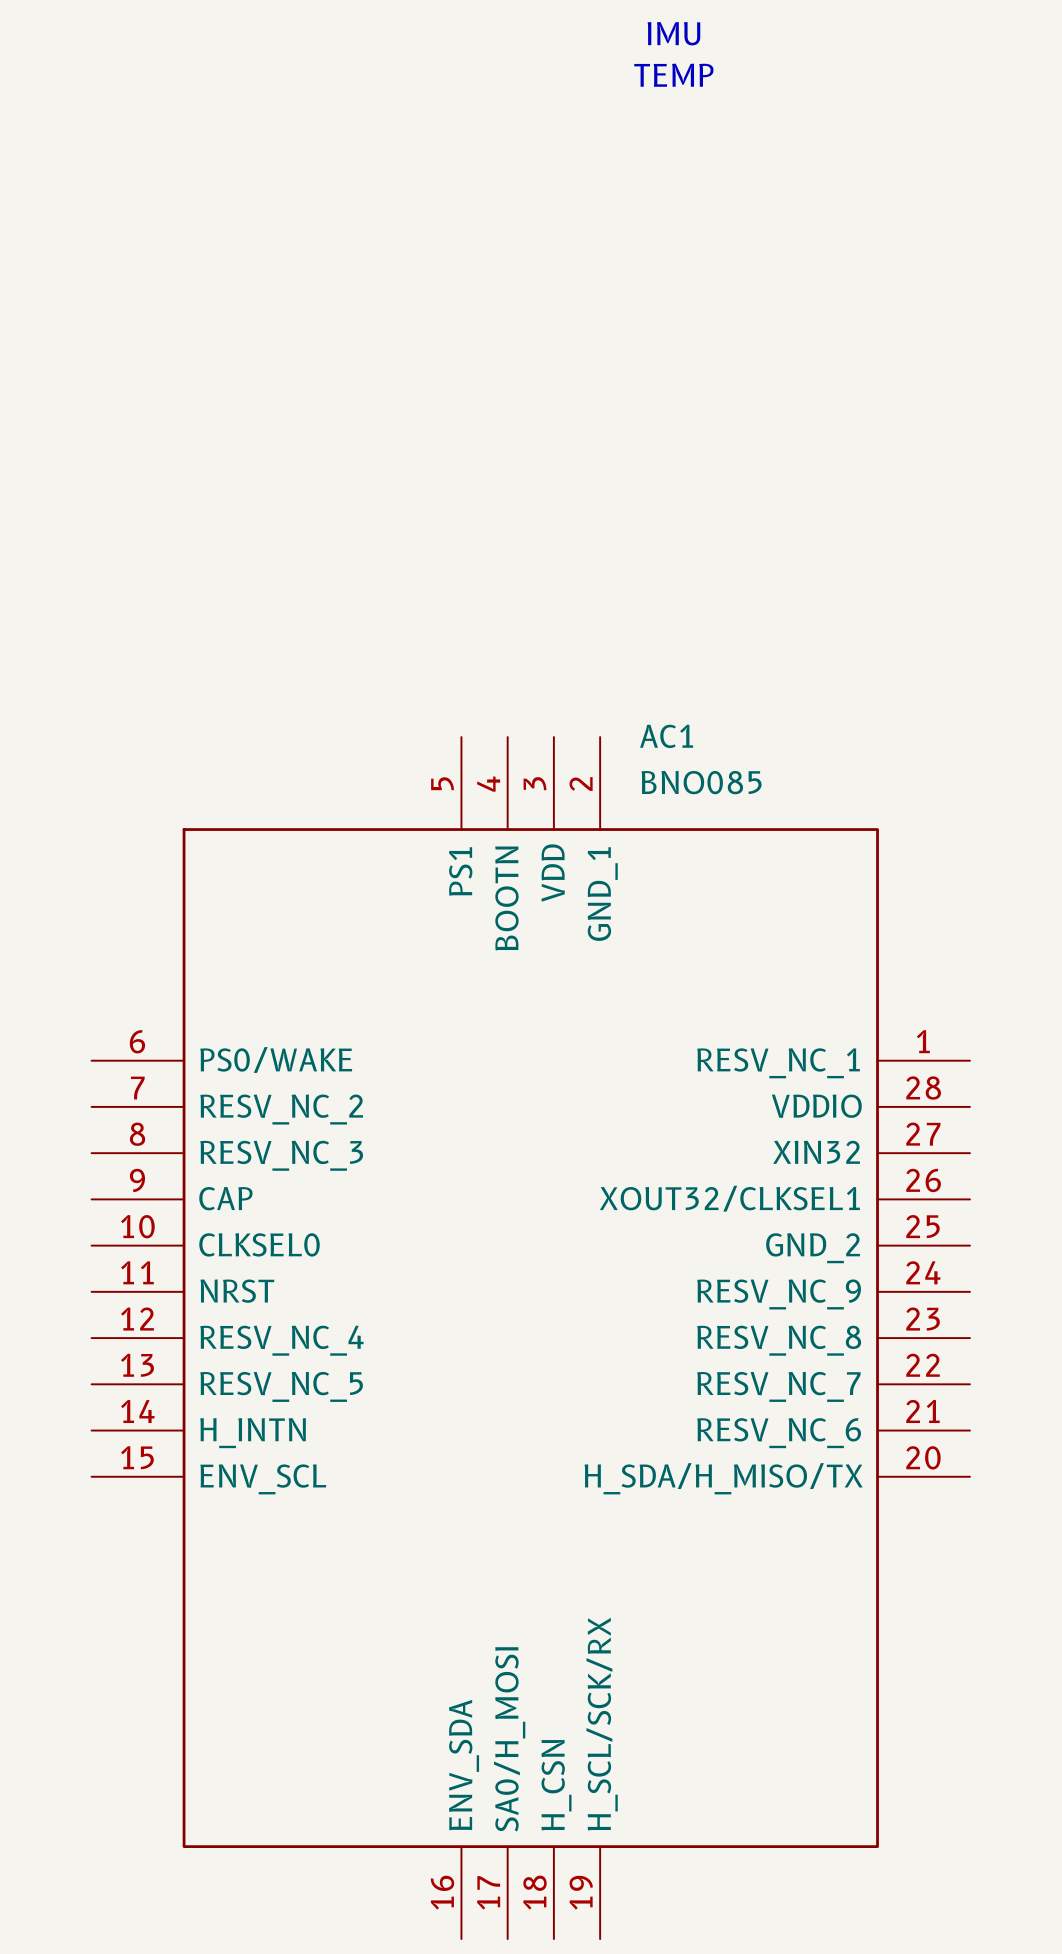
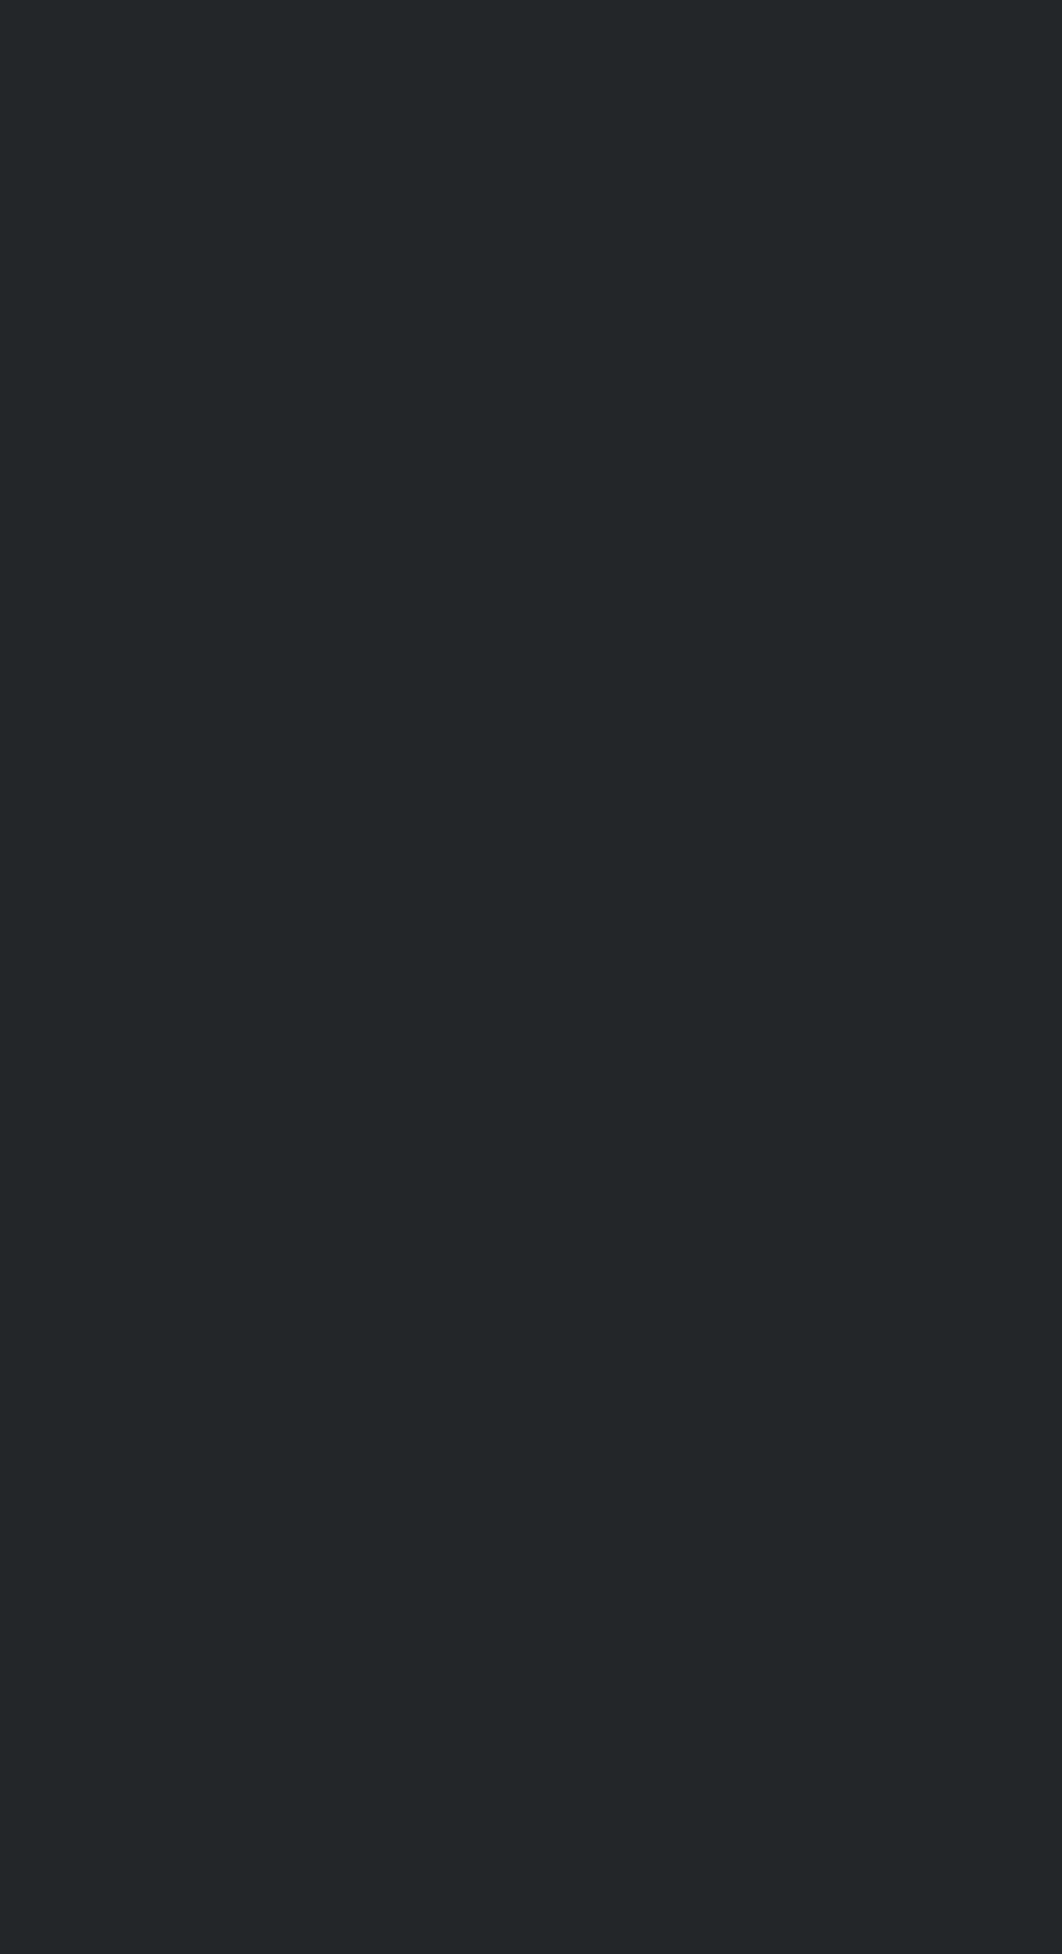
text: IMU (673, 33) -> none
text: TEMP (673, 75) -> none
AC1: BNO085 (530, 1338) -> none

